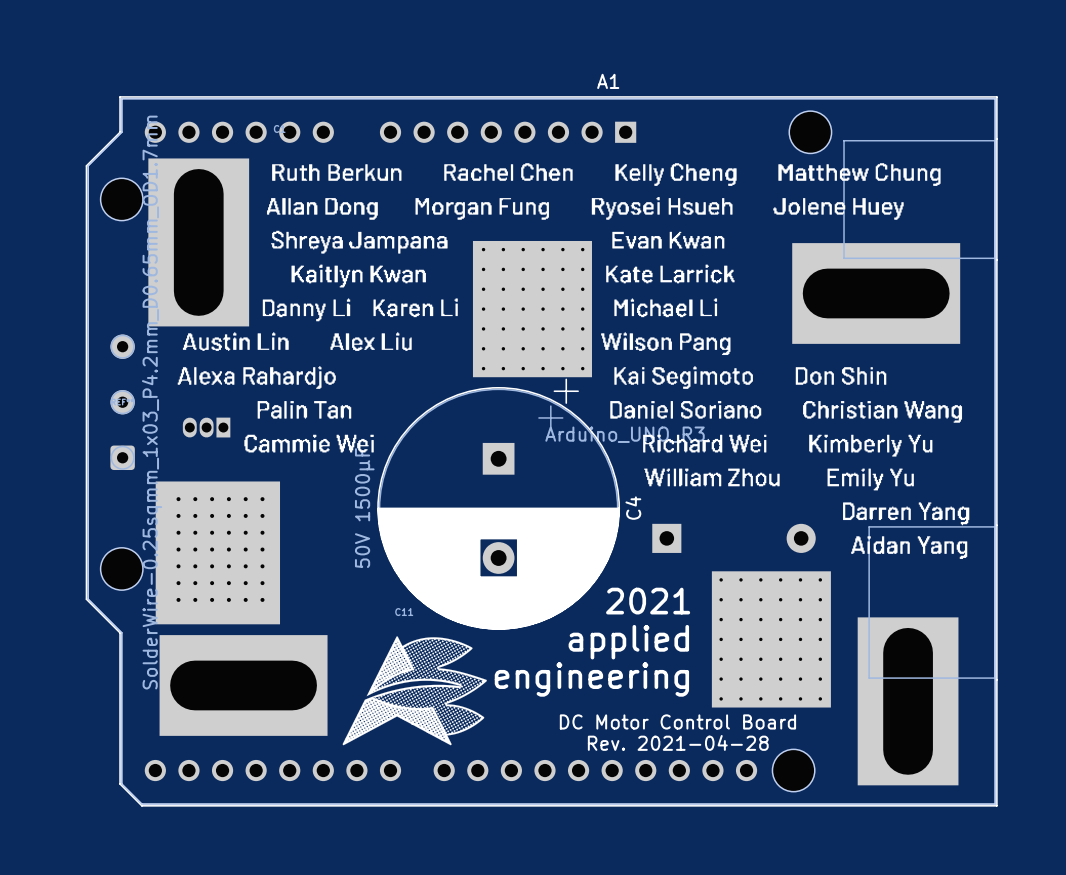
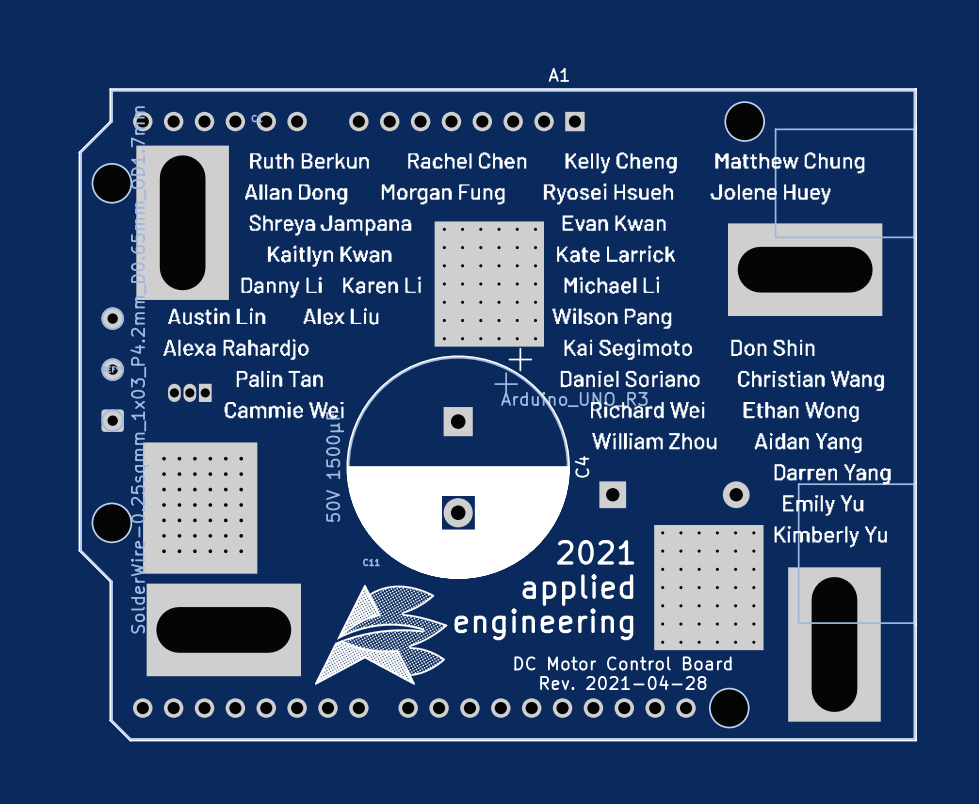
drawing: [177, 163, 970, 559] -> none
drawing: none -> [163, 152, 891, 548]

